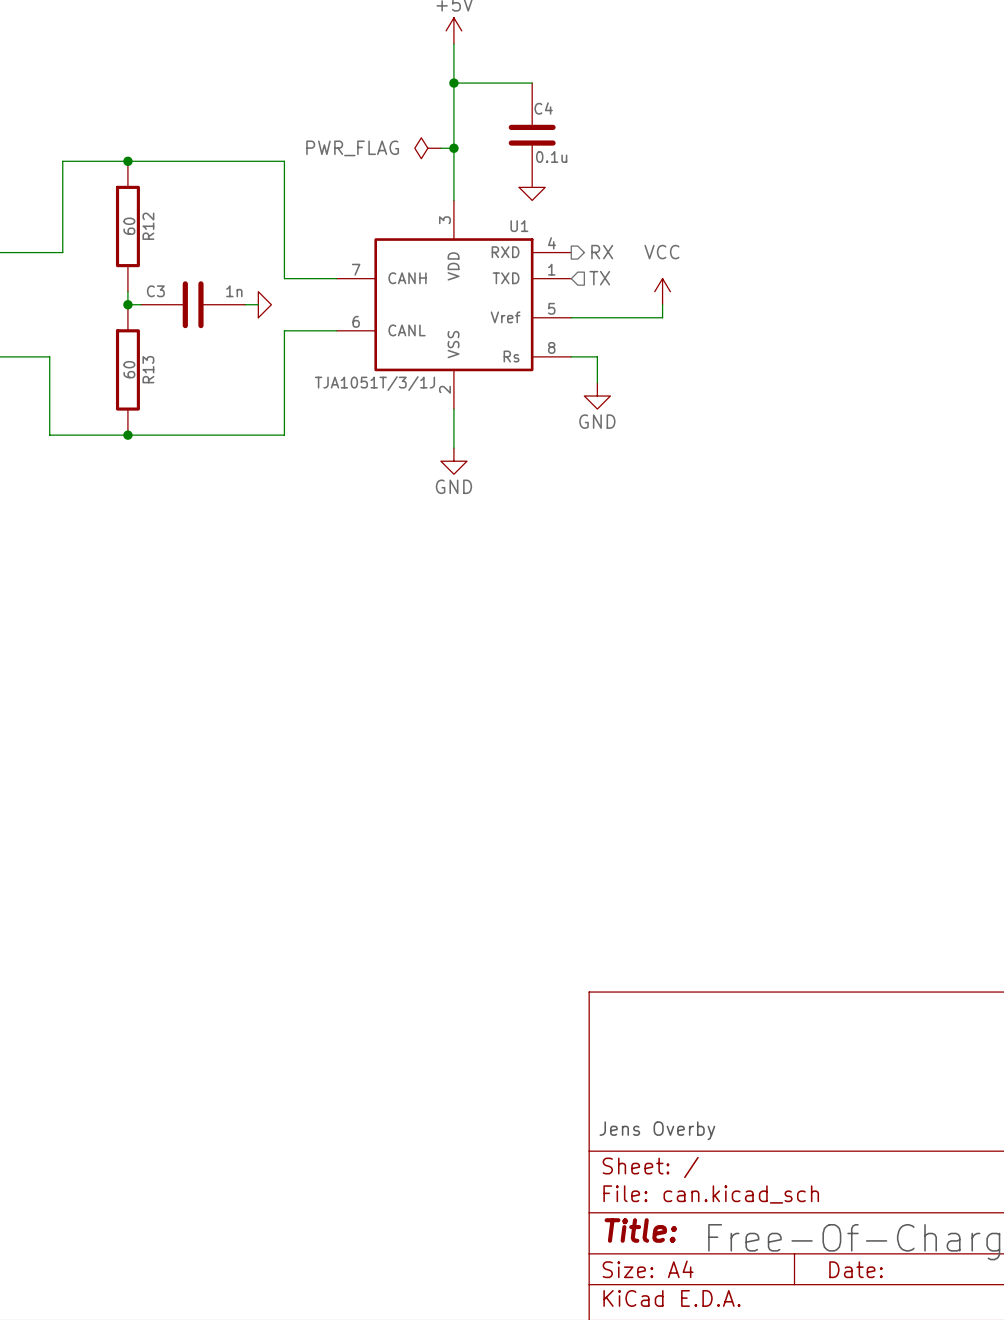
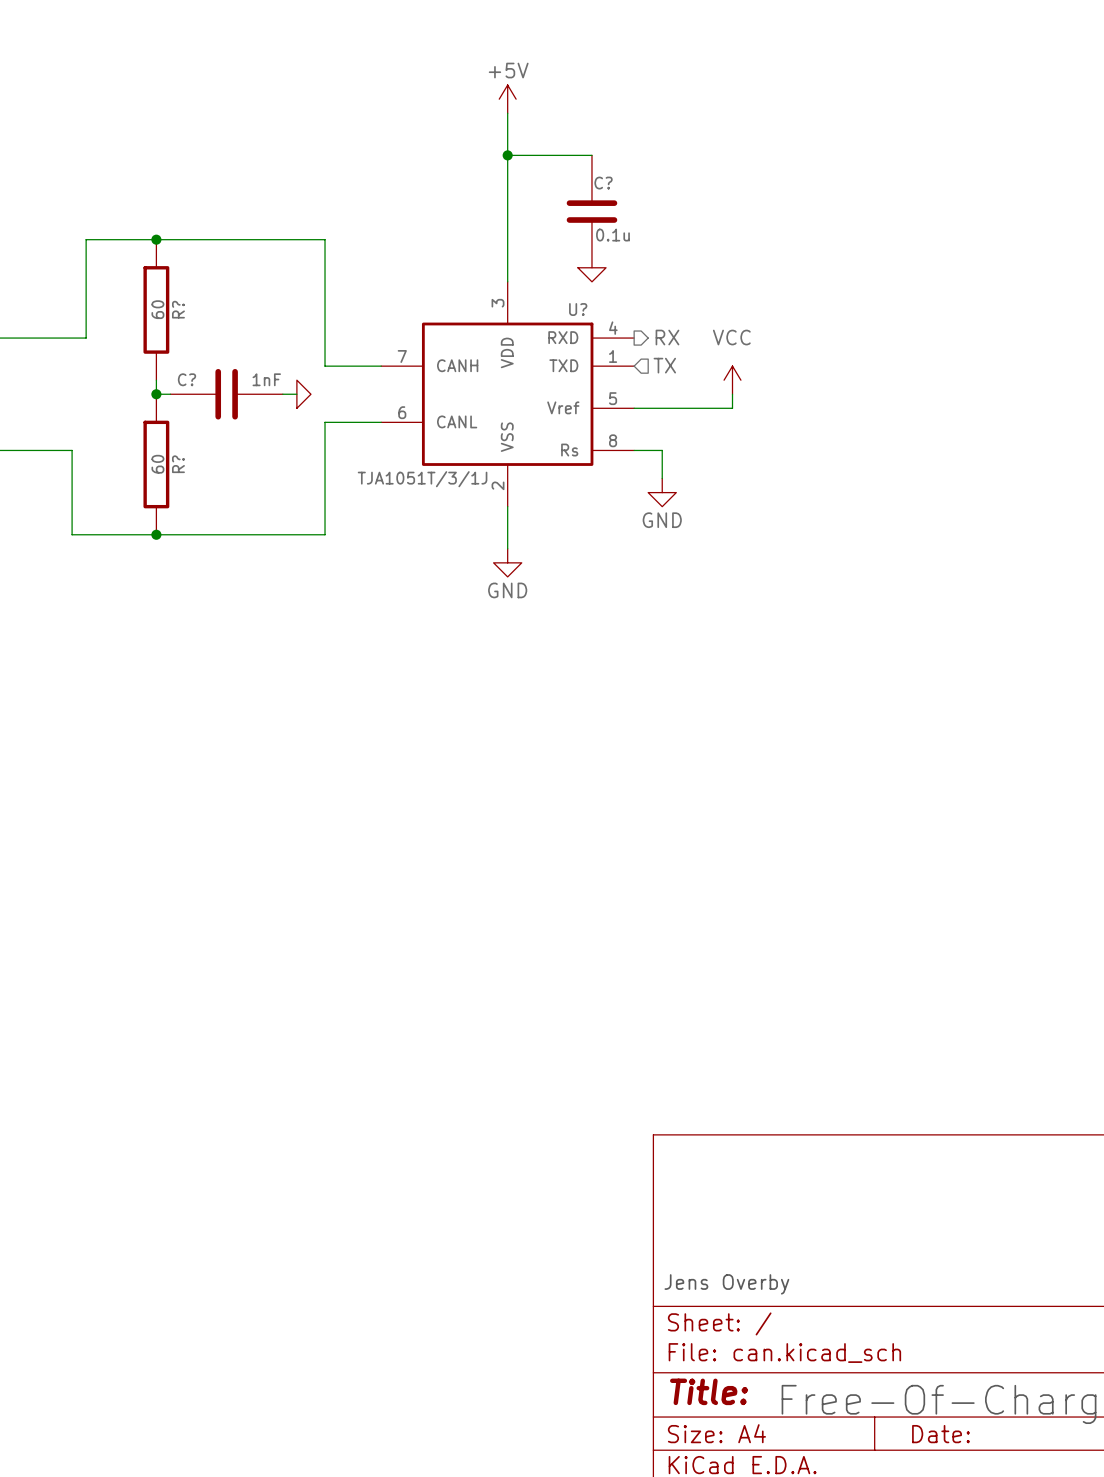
C4 name: C4 (543, 108) -> C? (603, 183)
power symbol: PWR_FLAG (427, 148) -> none
wire: (440, 148) (453, 148) -> none
junction: (453, 148) -> none
R12 name: R12 (148, 226) -> R? (178, 309)
U1 name: U1 (519, 226) -> U? (578, 309)
C3 name: C3 (155, 291) -> C? (186, 379)
C3 value: 1n (234, 291) -> 1nF (266, 379)
R13 name: R13 (148, 369) -> R? (178, 464)

